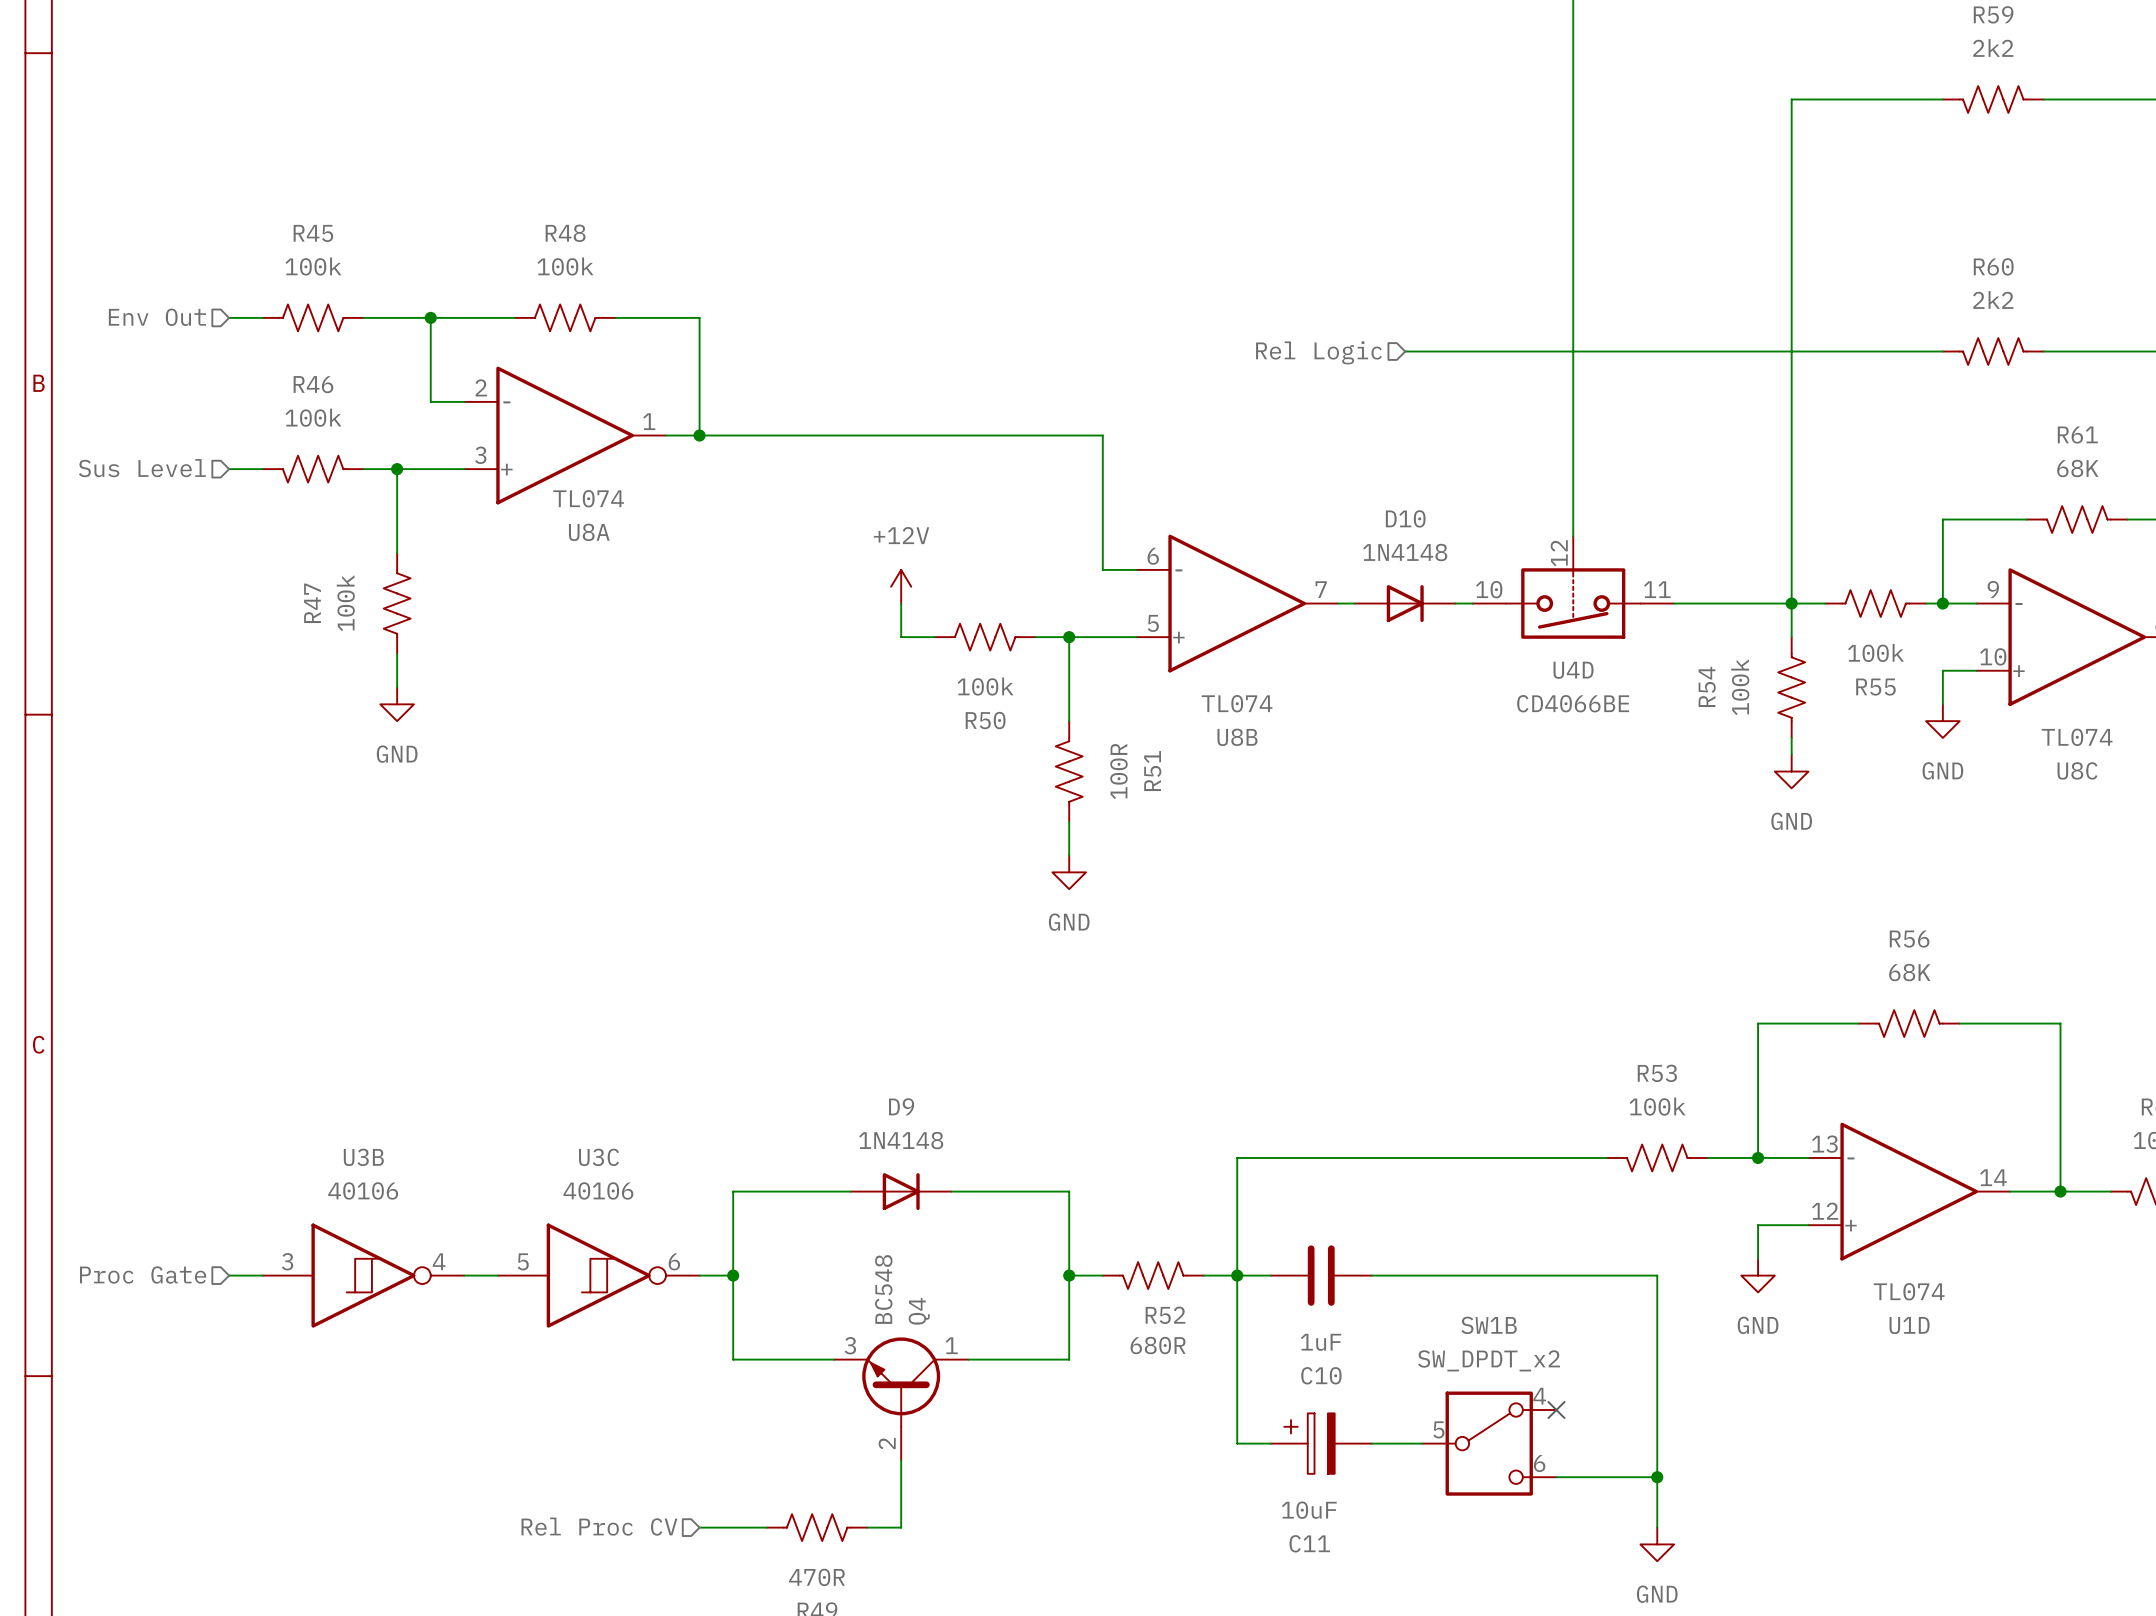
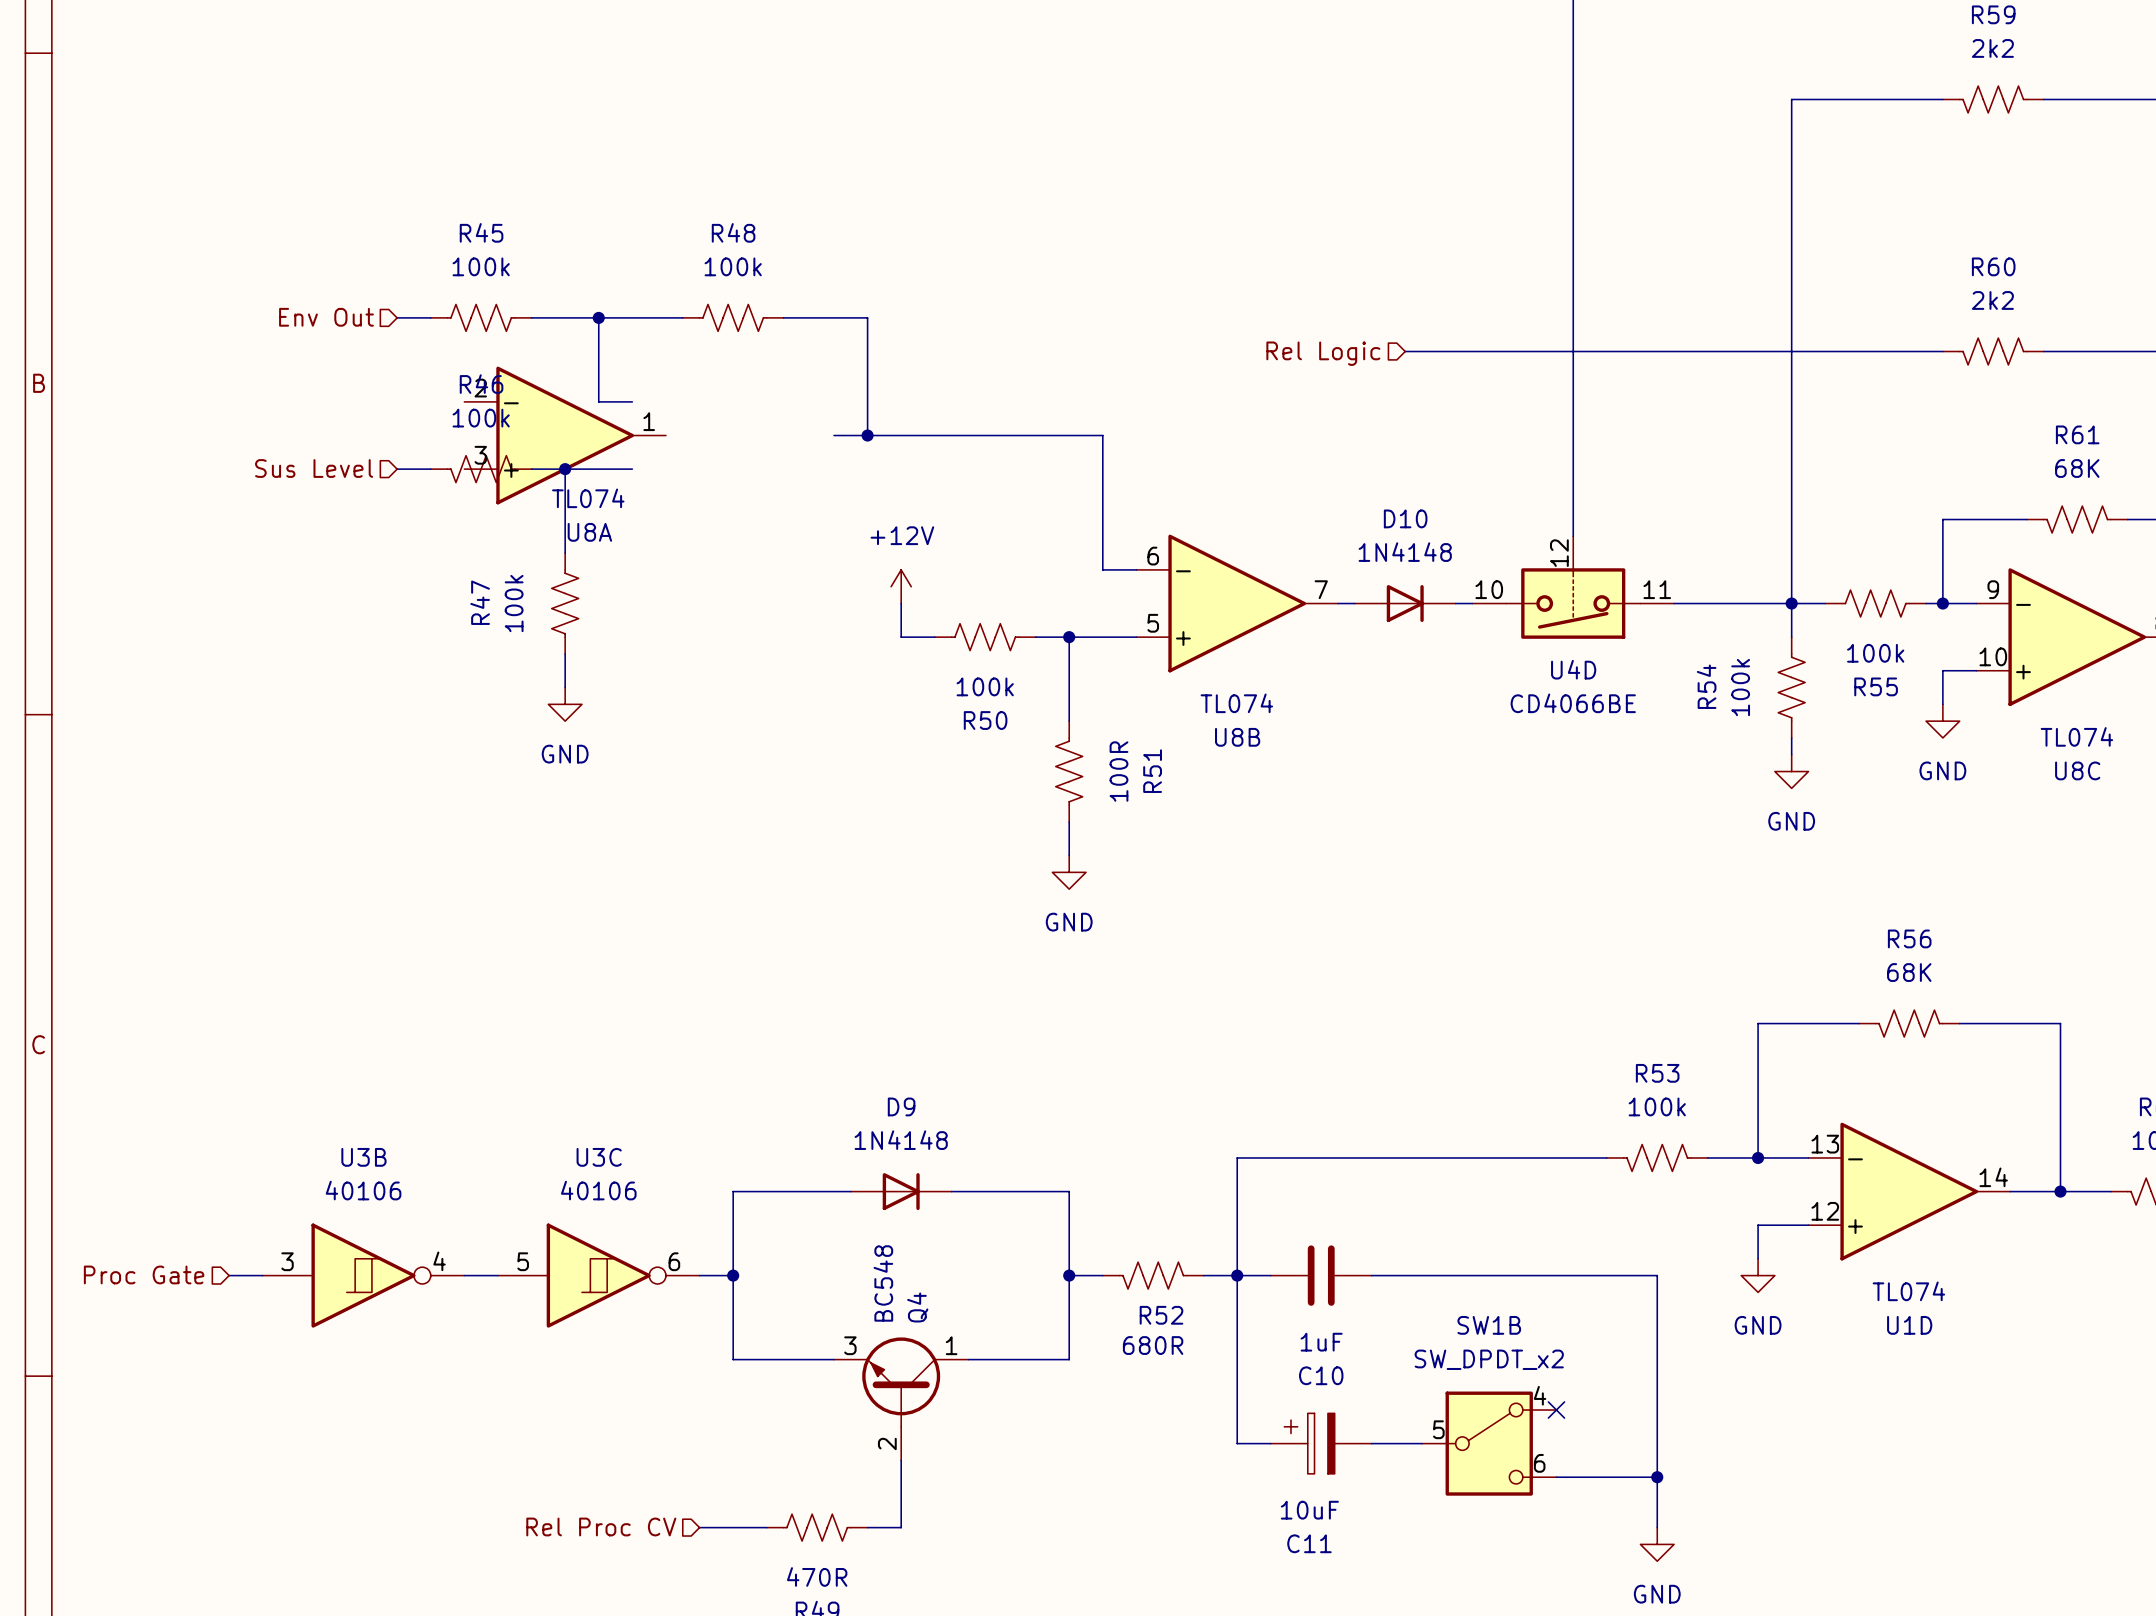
hierarchical label position: Env Out (157, 317) -> Env Out (326, 317)
wire: (229, 317) (262, 317) -> none
R45 position: (313, 317) -> (481, 317)
wire: (363, 317) (397, 317) -> none
junction: (430, 317) -> none
wire: (514, 317) (430, 317) (430, 401) (464, 401) -> none
wire: none -> (531, 317) (615, 317)
R48 position: (565, 317) -> (733, 317)
wire: none -> (598, 317) (598, 401) (632, 401)
junction: none -> (598, 317)
wire: (682, 317) (699, 317) (699, 435) -> none
wire: none -> (783, 317) (867, 317) (867, 435)
wire: (665, 435) (833, 435) -> none
junction: (699, 435) -> none
junction: none -> (867, 435)
hierarchical label position: Sus Level (142, 468) -> Sus Level (314, 468)
wire: (229, 469) (262, 469) -> none
R46 position: (313, 469) -> (481, 469)
wire: (363, 469) (397, 469) (397, 553) -> none
junction: (397, 469) -> none
wire: none -> (531, 469) (632, 469)
wire: none -> (565, 469) (565, 553)
junction: none -> (565, 469)
R47 position: (397, 603) -> (565, 603)
wire: (397, 653) (397, 687) -> (565, 653) (565, 687)
power symbol position: GND (397, 704) -> GND (565, 704)

